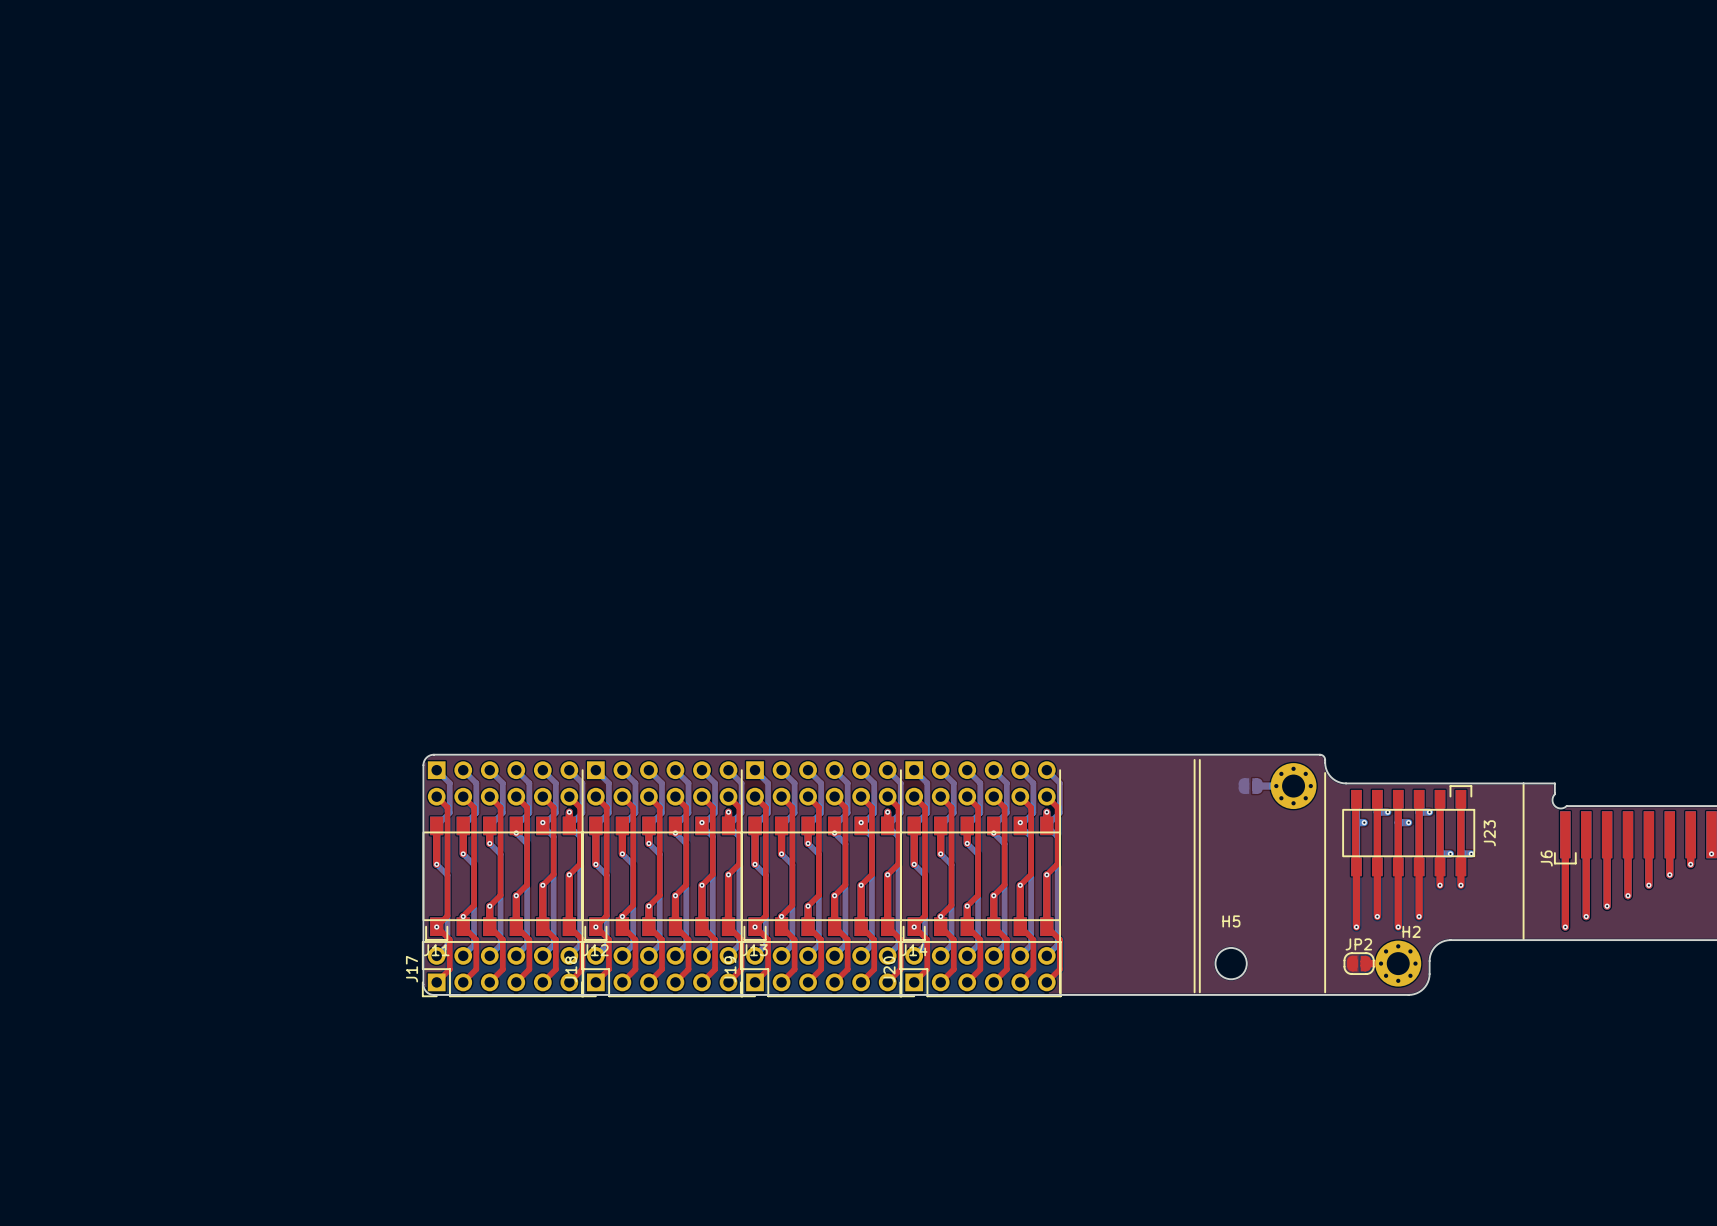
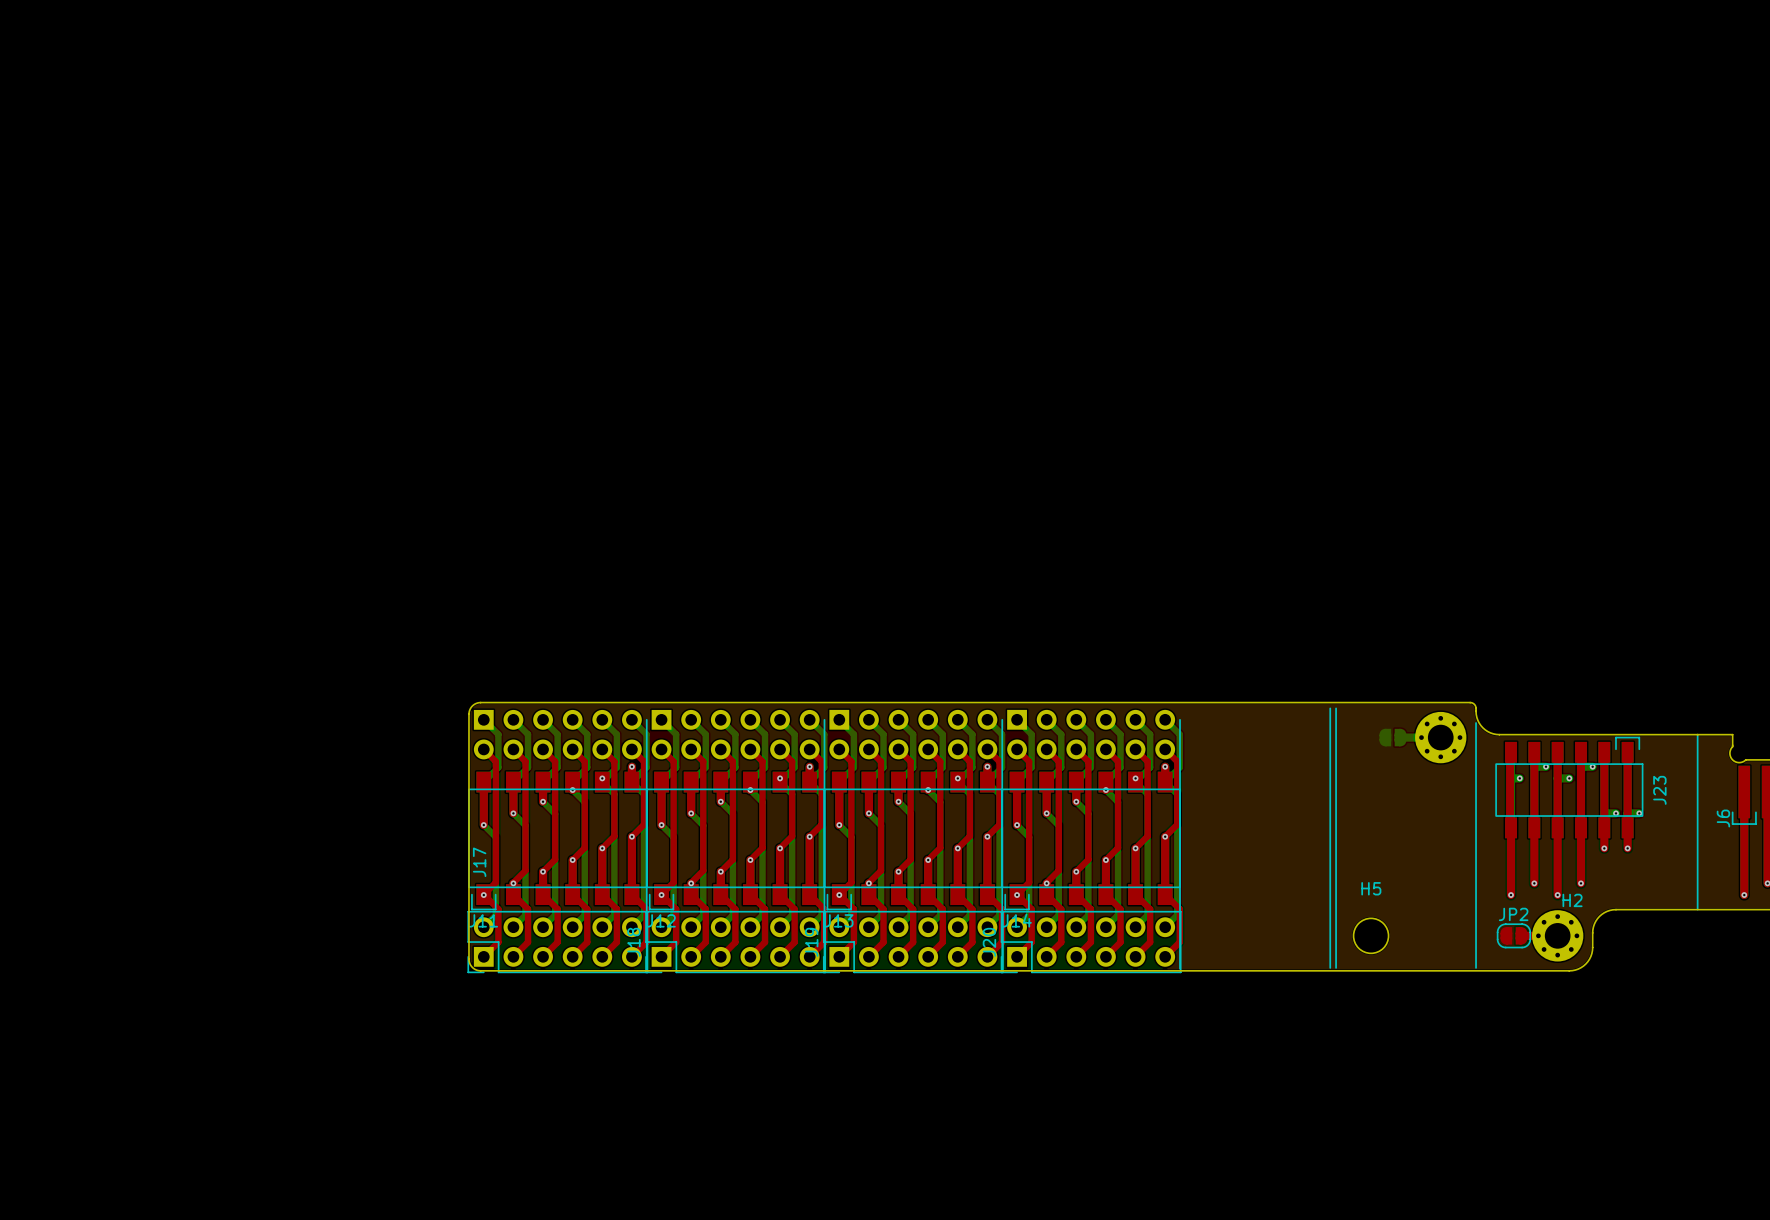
J17 name position: J17 (411, 969) -> J17 (479, 862)

